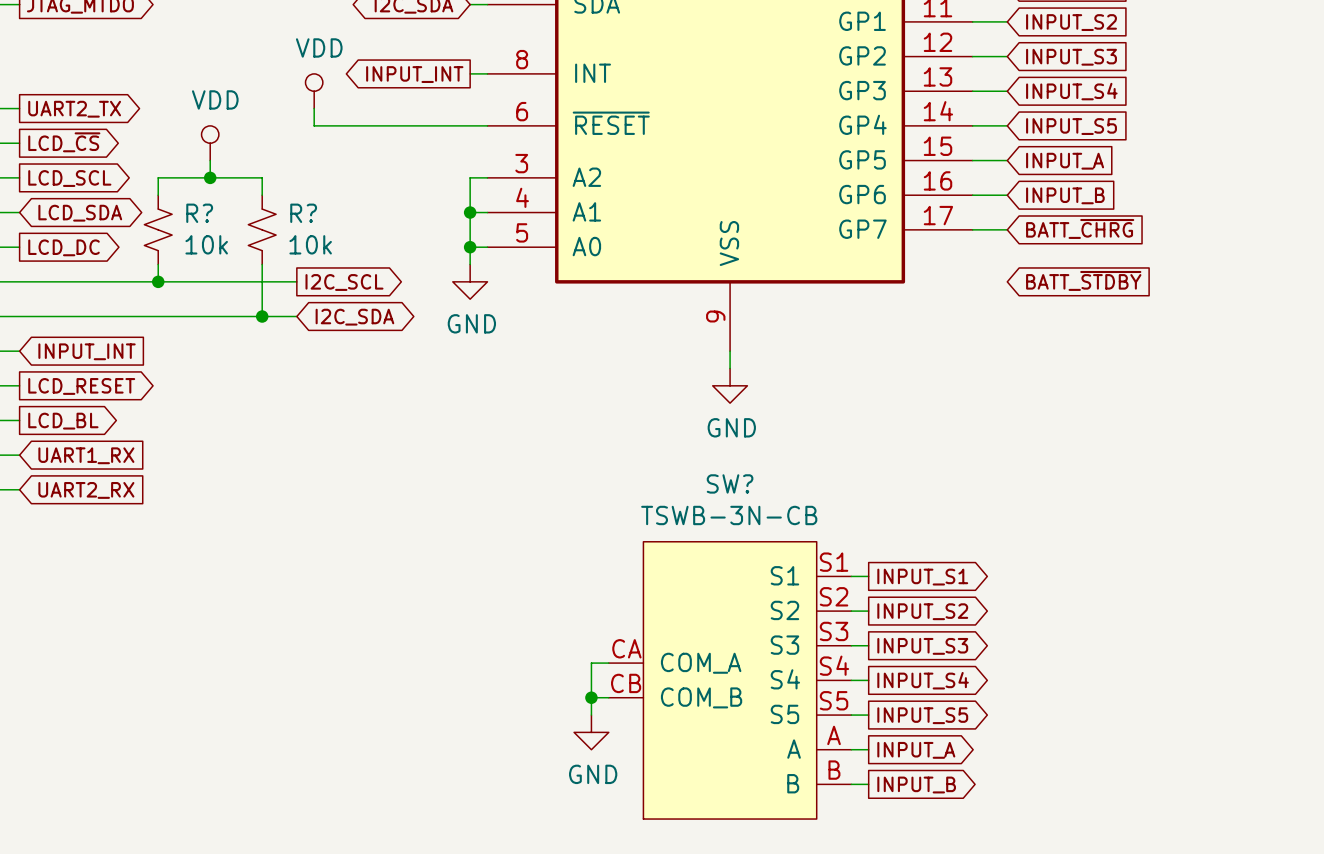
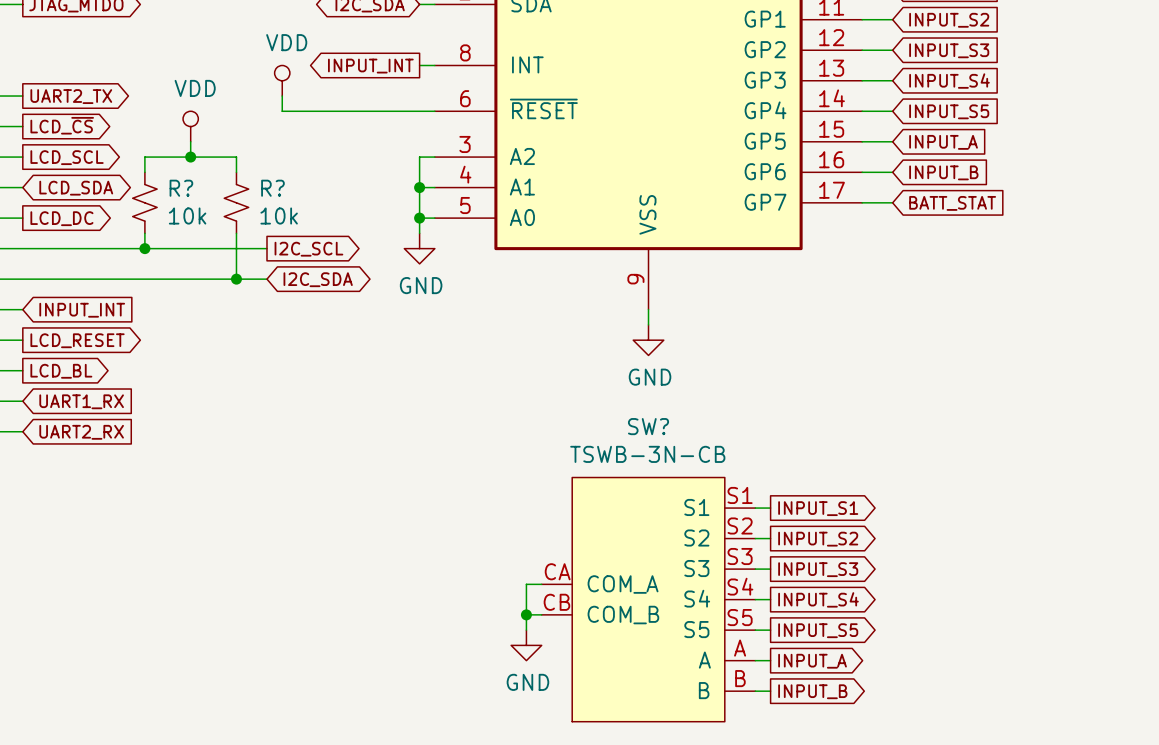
global label: BATT_~{CHRG} (1080, 228) -> BATT_STAT (952, 203)
global label: BATT_~{STDBY} (1083, 280) -> none

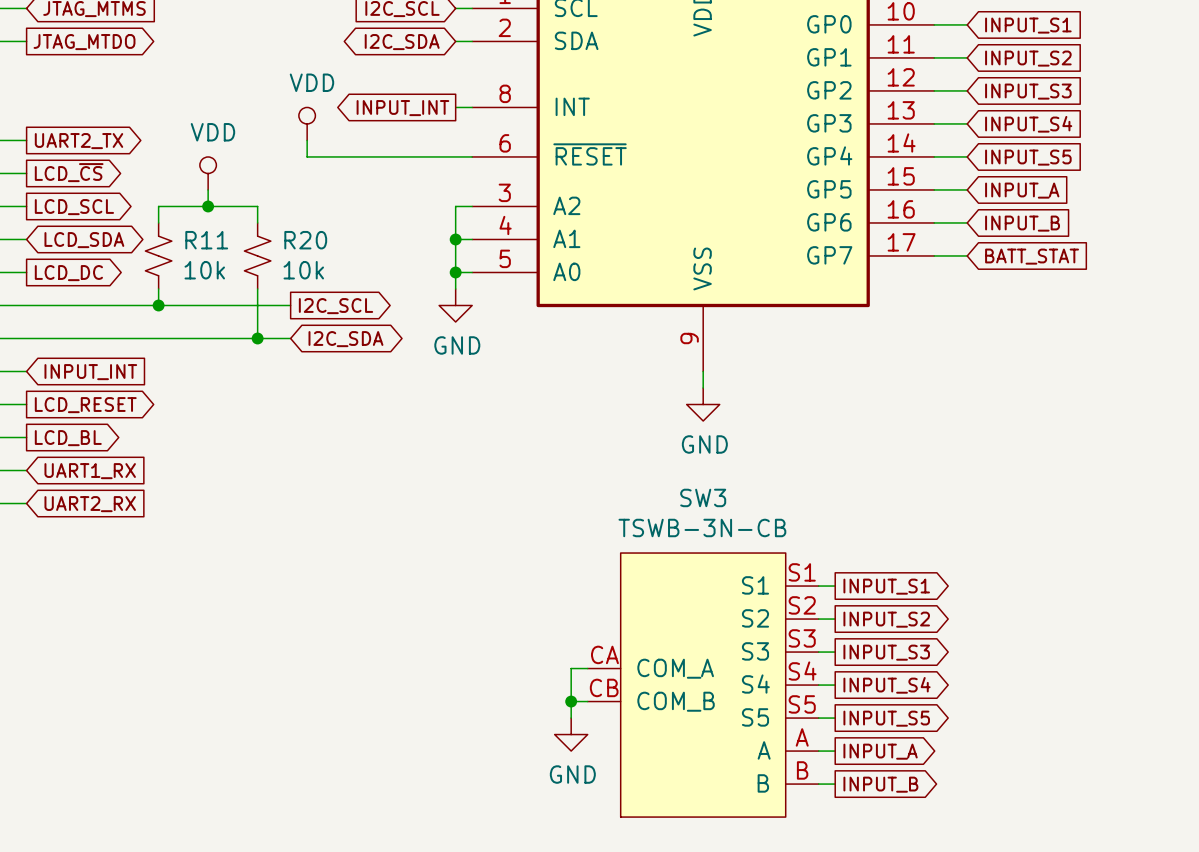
R? name: R? (181, 188) -> R11 (206, 240)
R? name: R? (272, 188) -> R20 (305, 240)
SW? name: SW? (648, 426) -> SW3 (703, 497)

